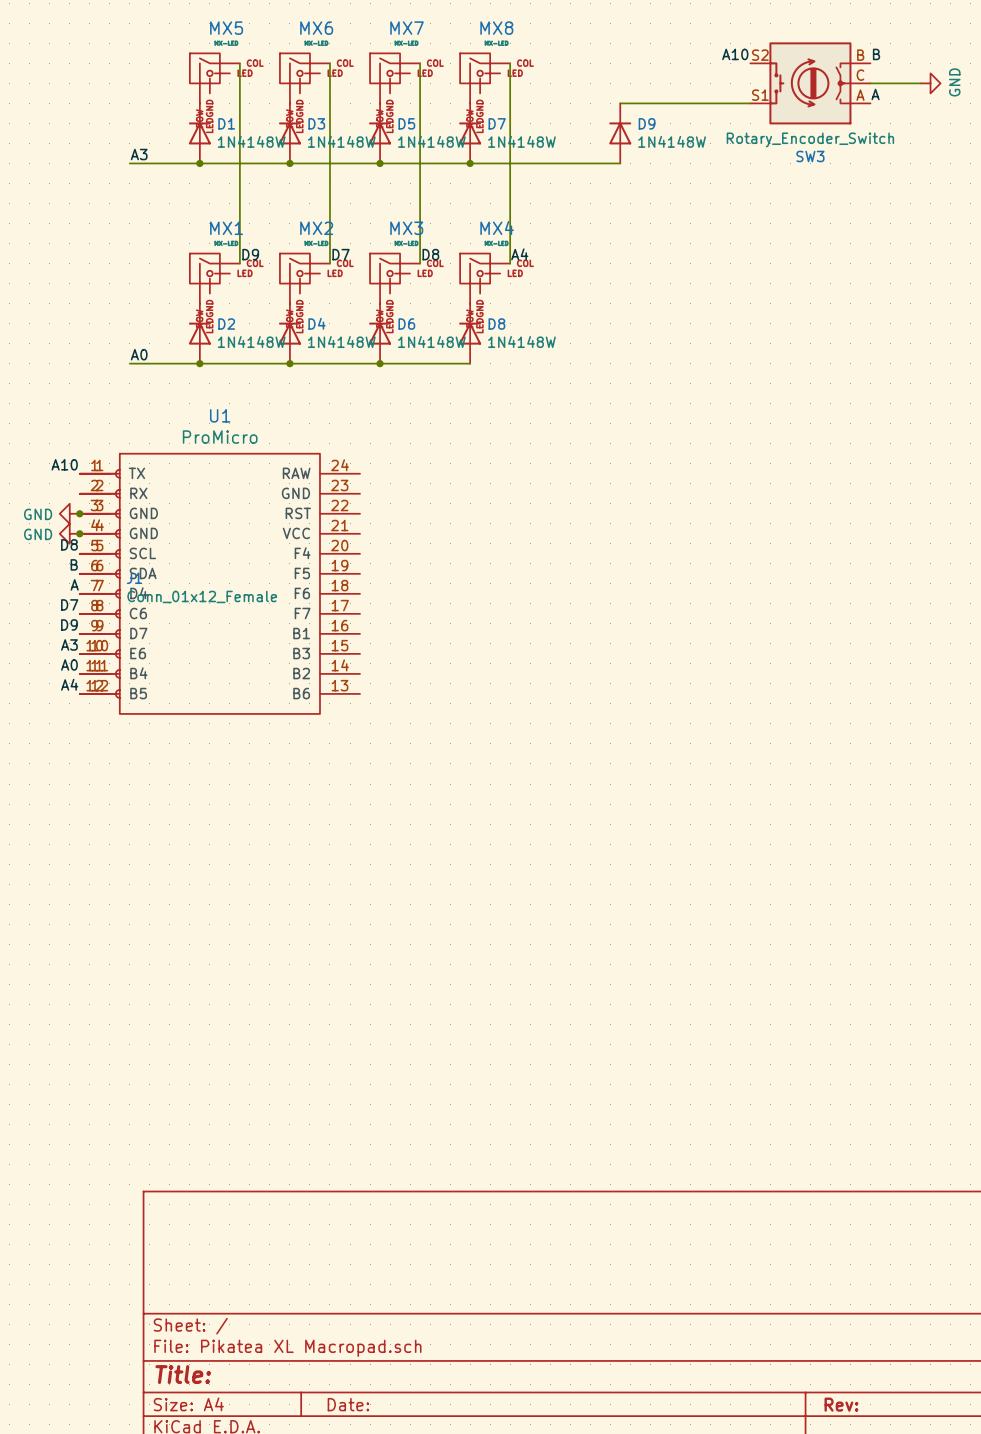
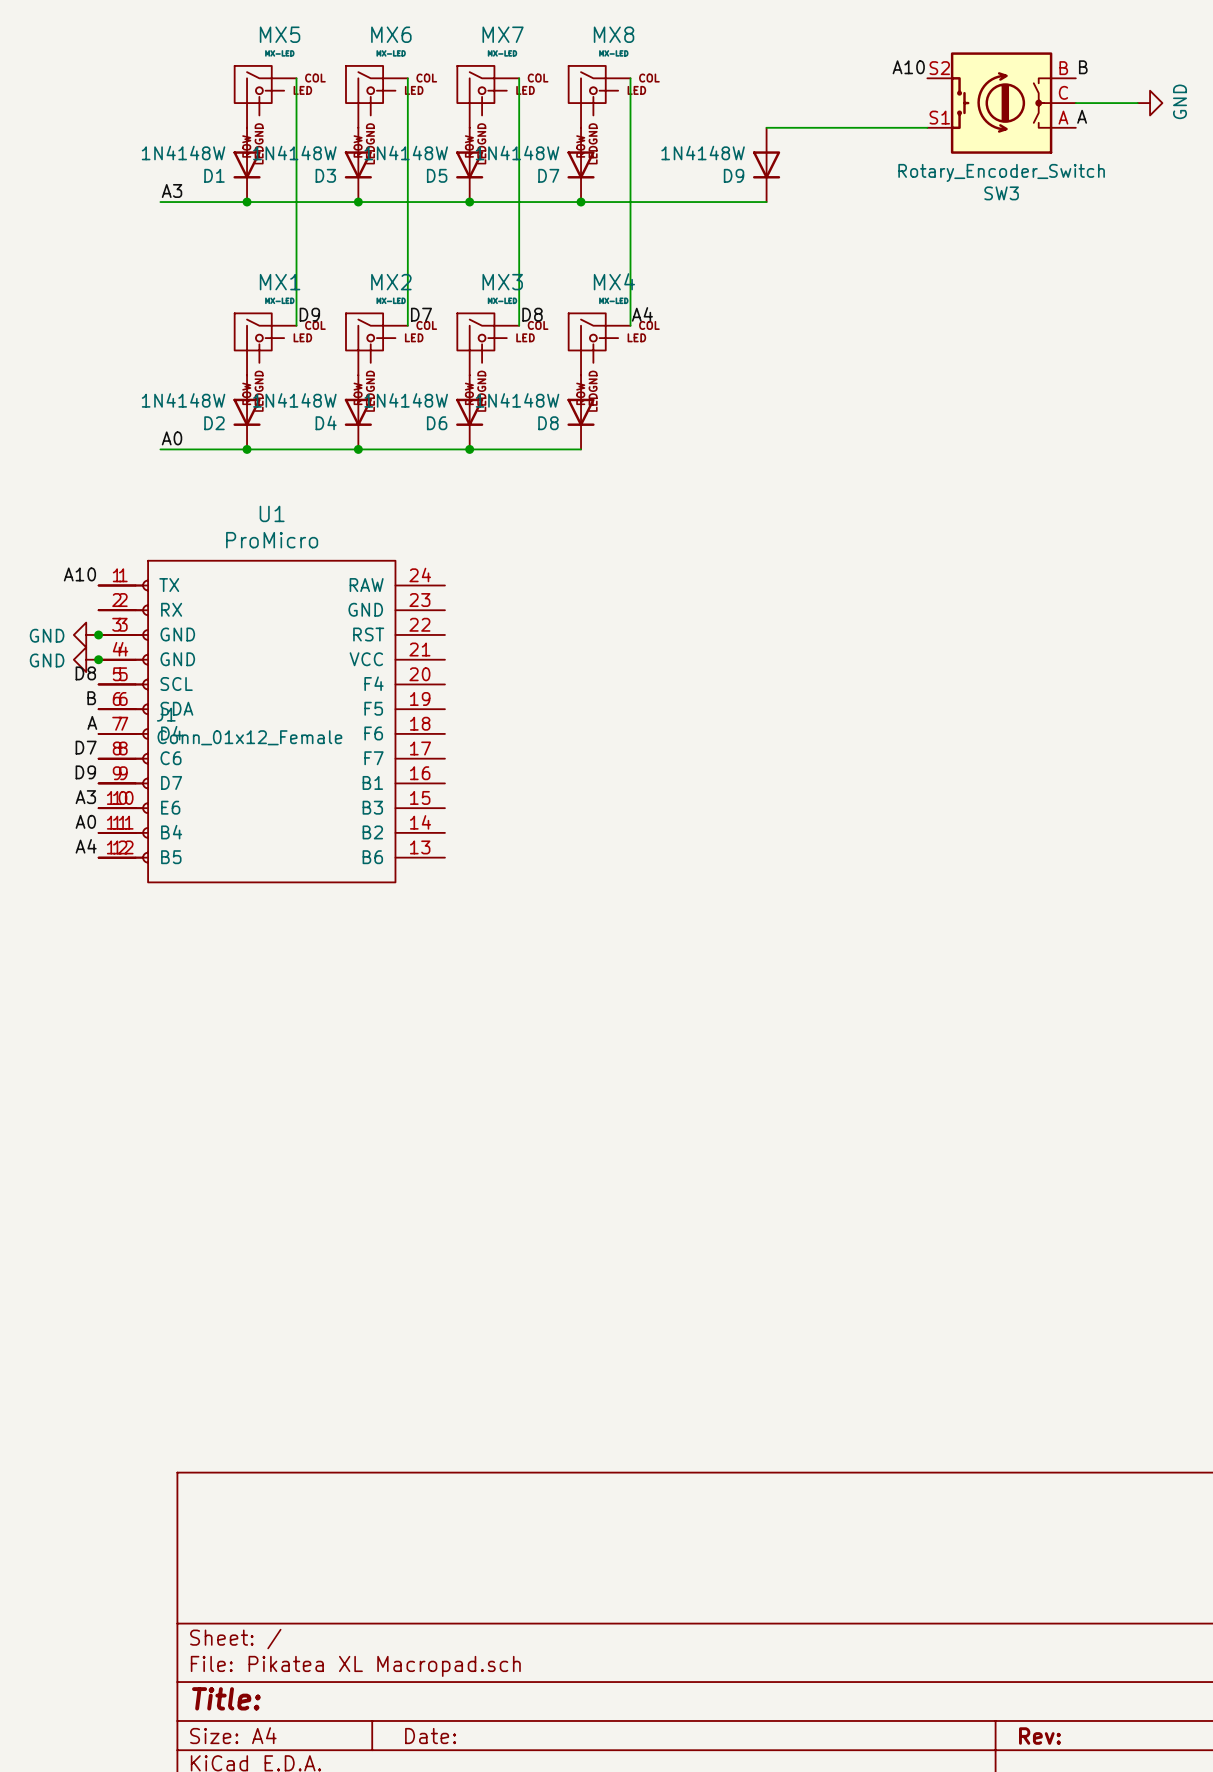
D1 rotation: 0° (199, 133) -> 180° (247, 164)
D3 rotation: 0° (289, 133) -> 180° (358, 164)
D5 rotation: 0° (380, 133) -> 180° (469, 164)
D7 rotation: 0° (470, 133) -> 180° (581, 164)
D9 rotation: 0° (620, 133) -> 180° (766, 164)
D2 rotation: 0° (199, 333) -> 180° (247, 412)
D4 rotation: 0° (289, 333) -> 180° (358, 412)
D6 rotation: 0° (380, 333) -> 180° (469, 412)
D8 rotation: 0° (470, 333) -> 180° (581, 412)

